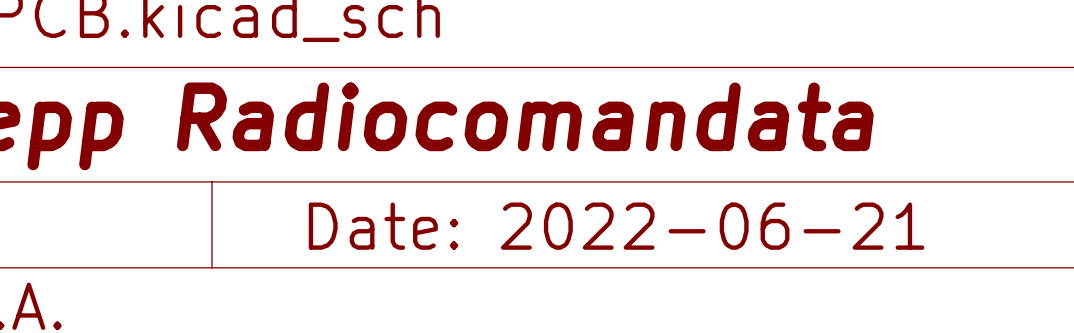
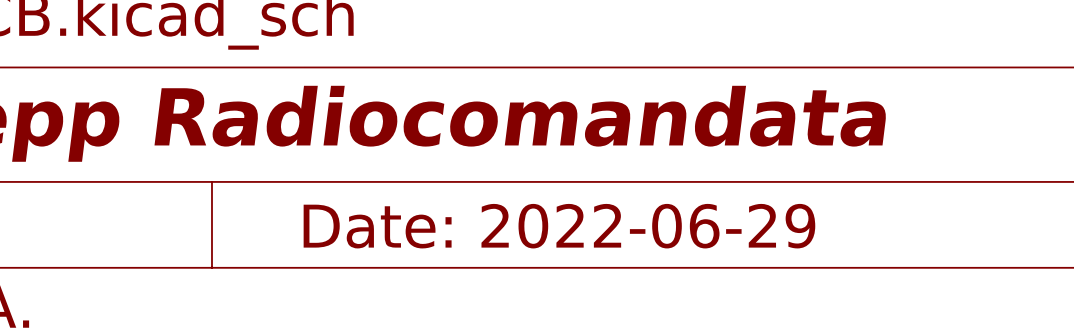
title block: Date: 2022-06-21 (616, 226) -> Date: 2022-06-29 (559, 226)

